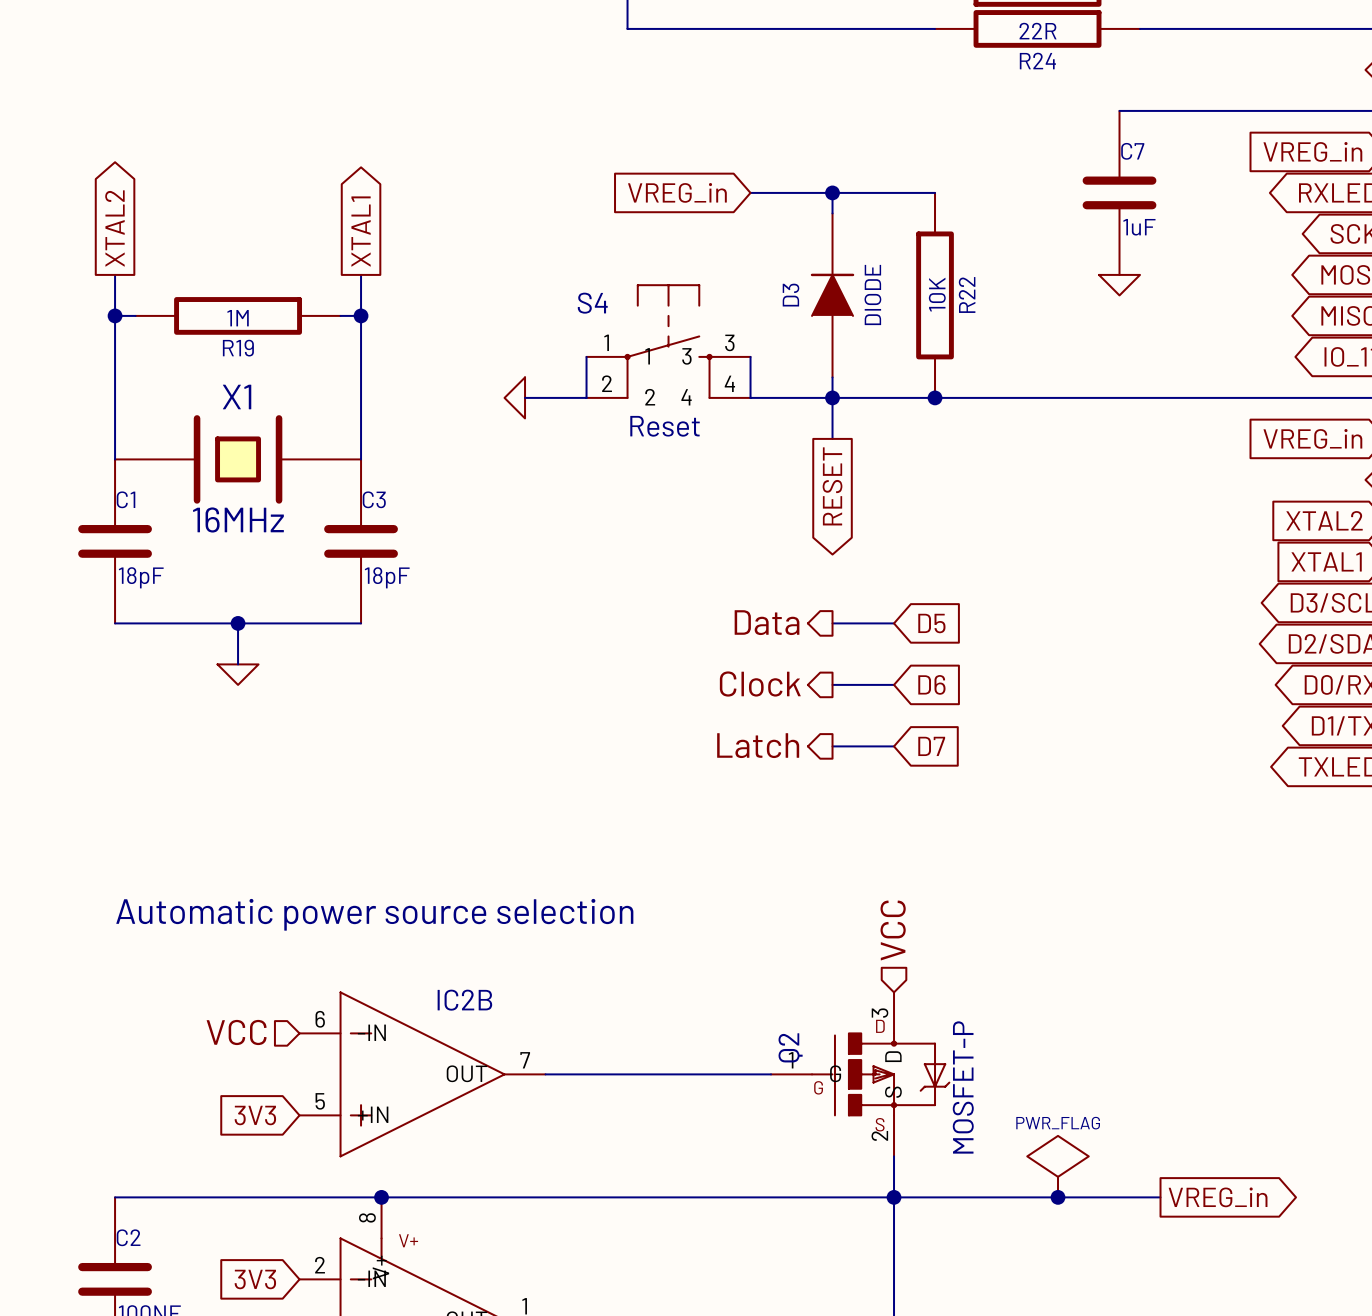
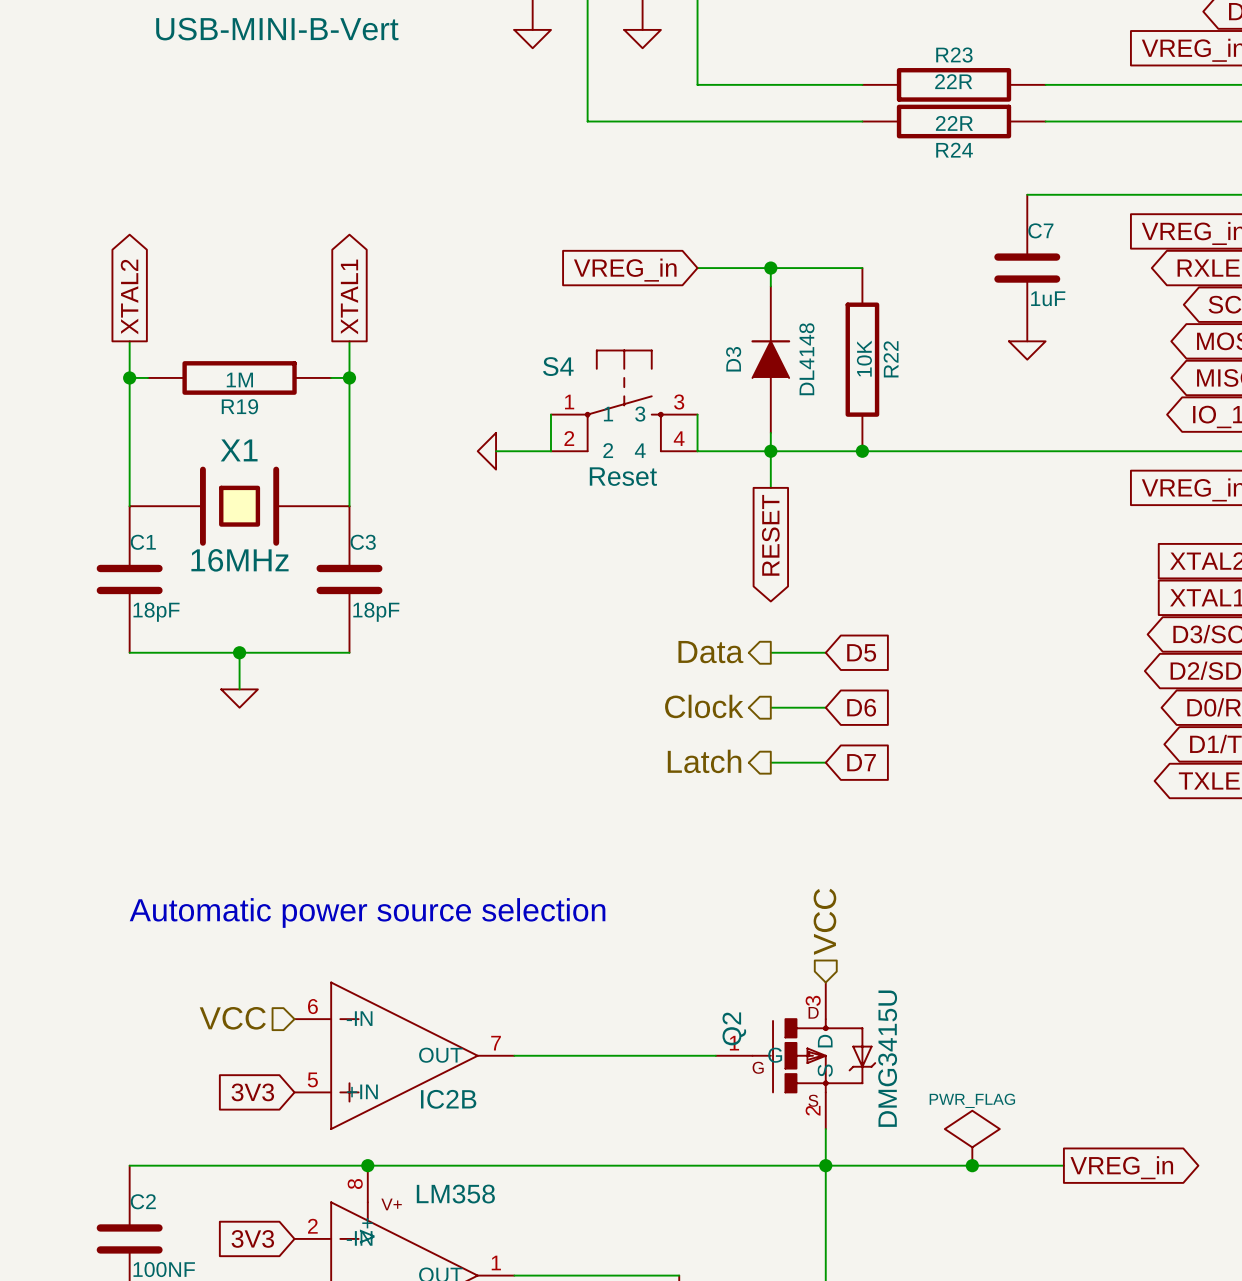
D3 value: DIODE (872, 295) -> DL4148 (806, 359)
IC2B name position: IC2B (464, 1000) -> IC2B (448, 1099)
Q2 value: MOSFET-P (963, 1087) -> DMG3415U (887, 1058)
part value: none -> LM358 (455, 1194)

